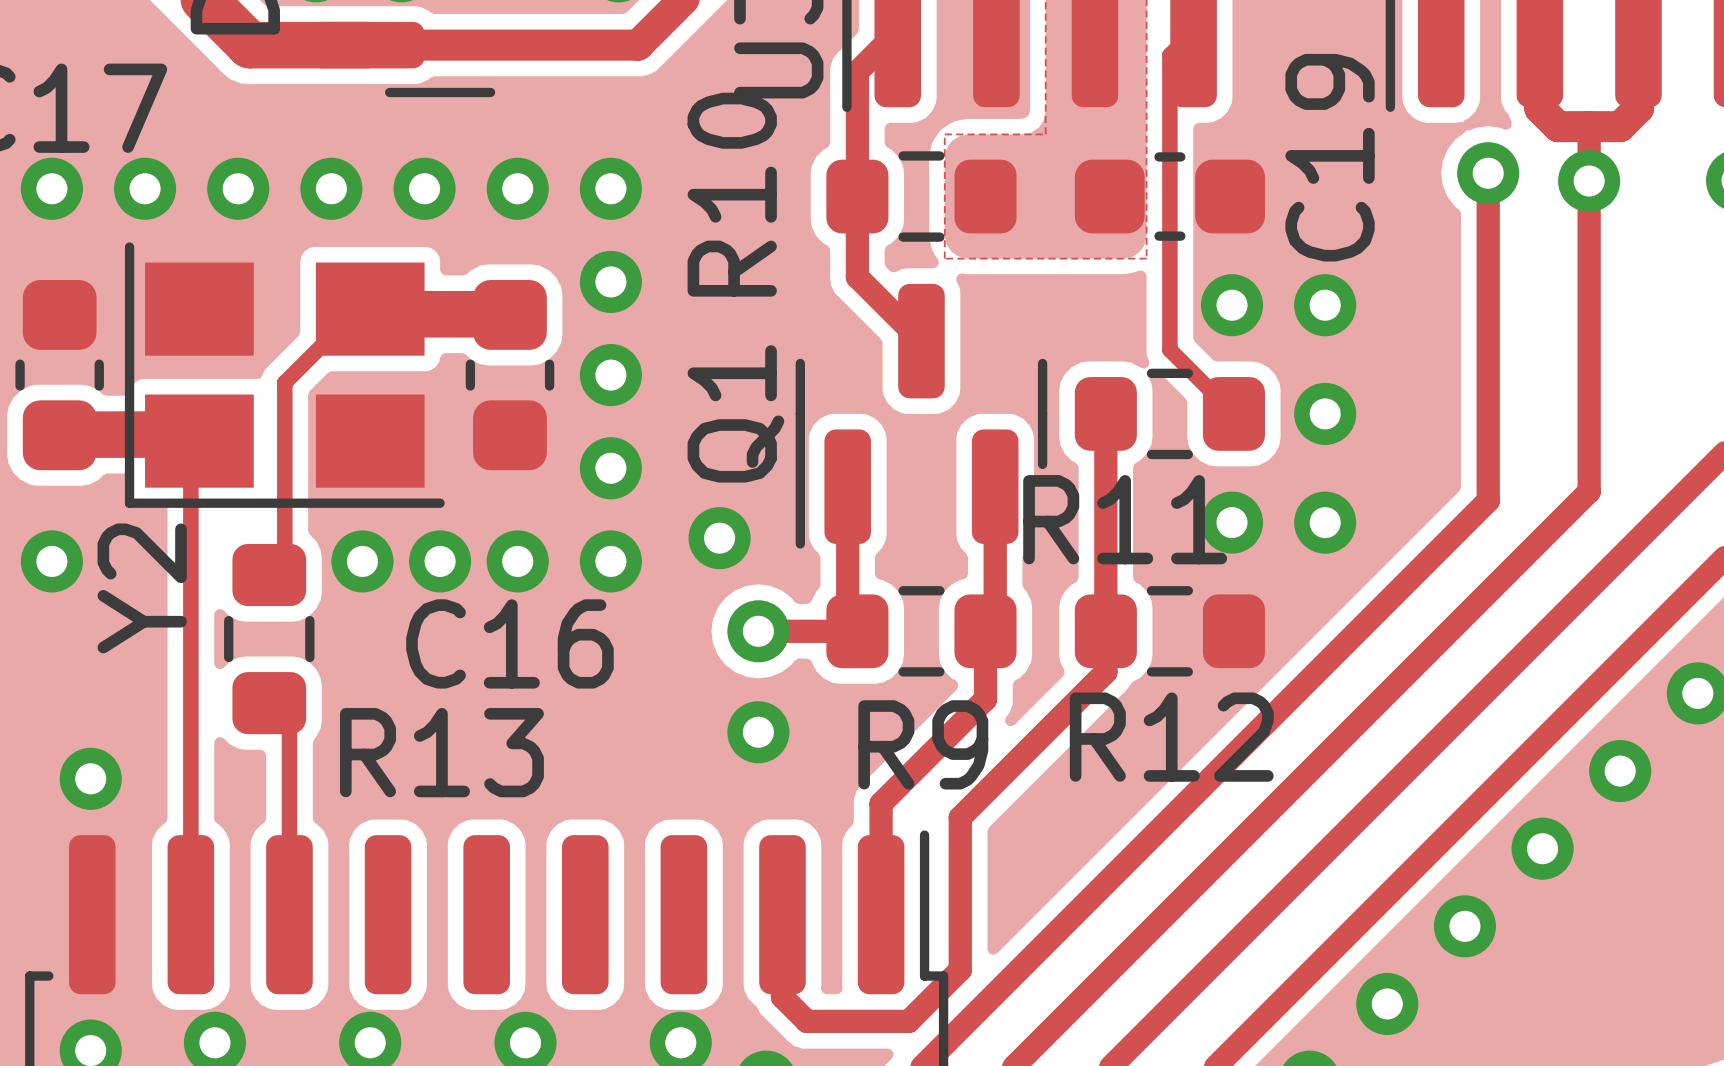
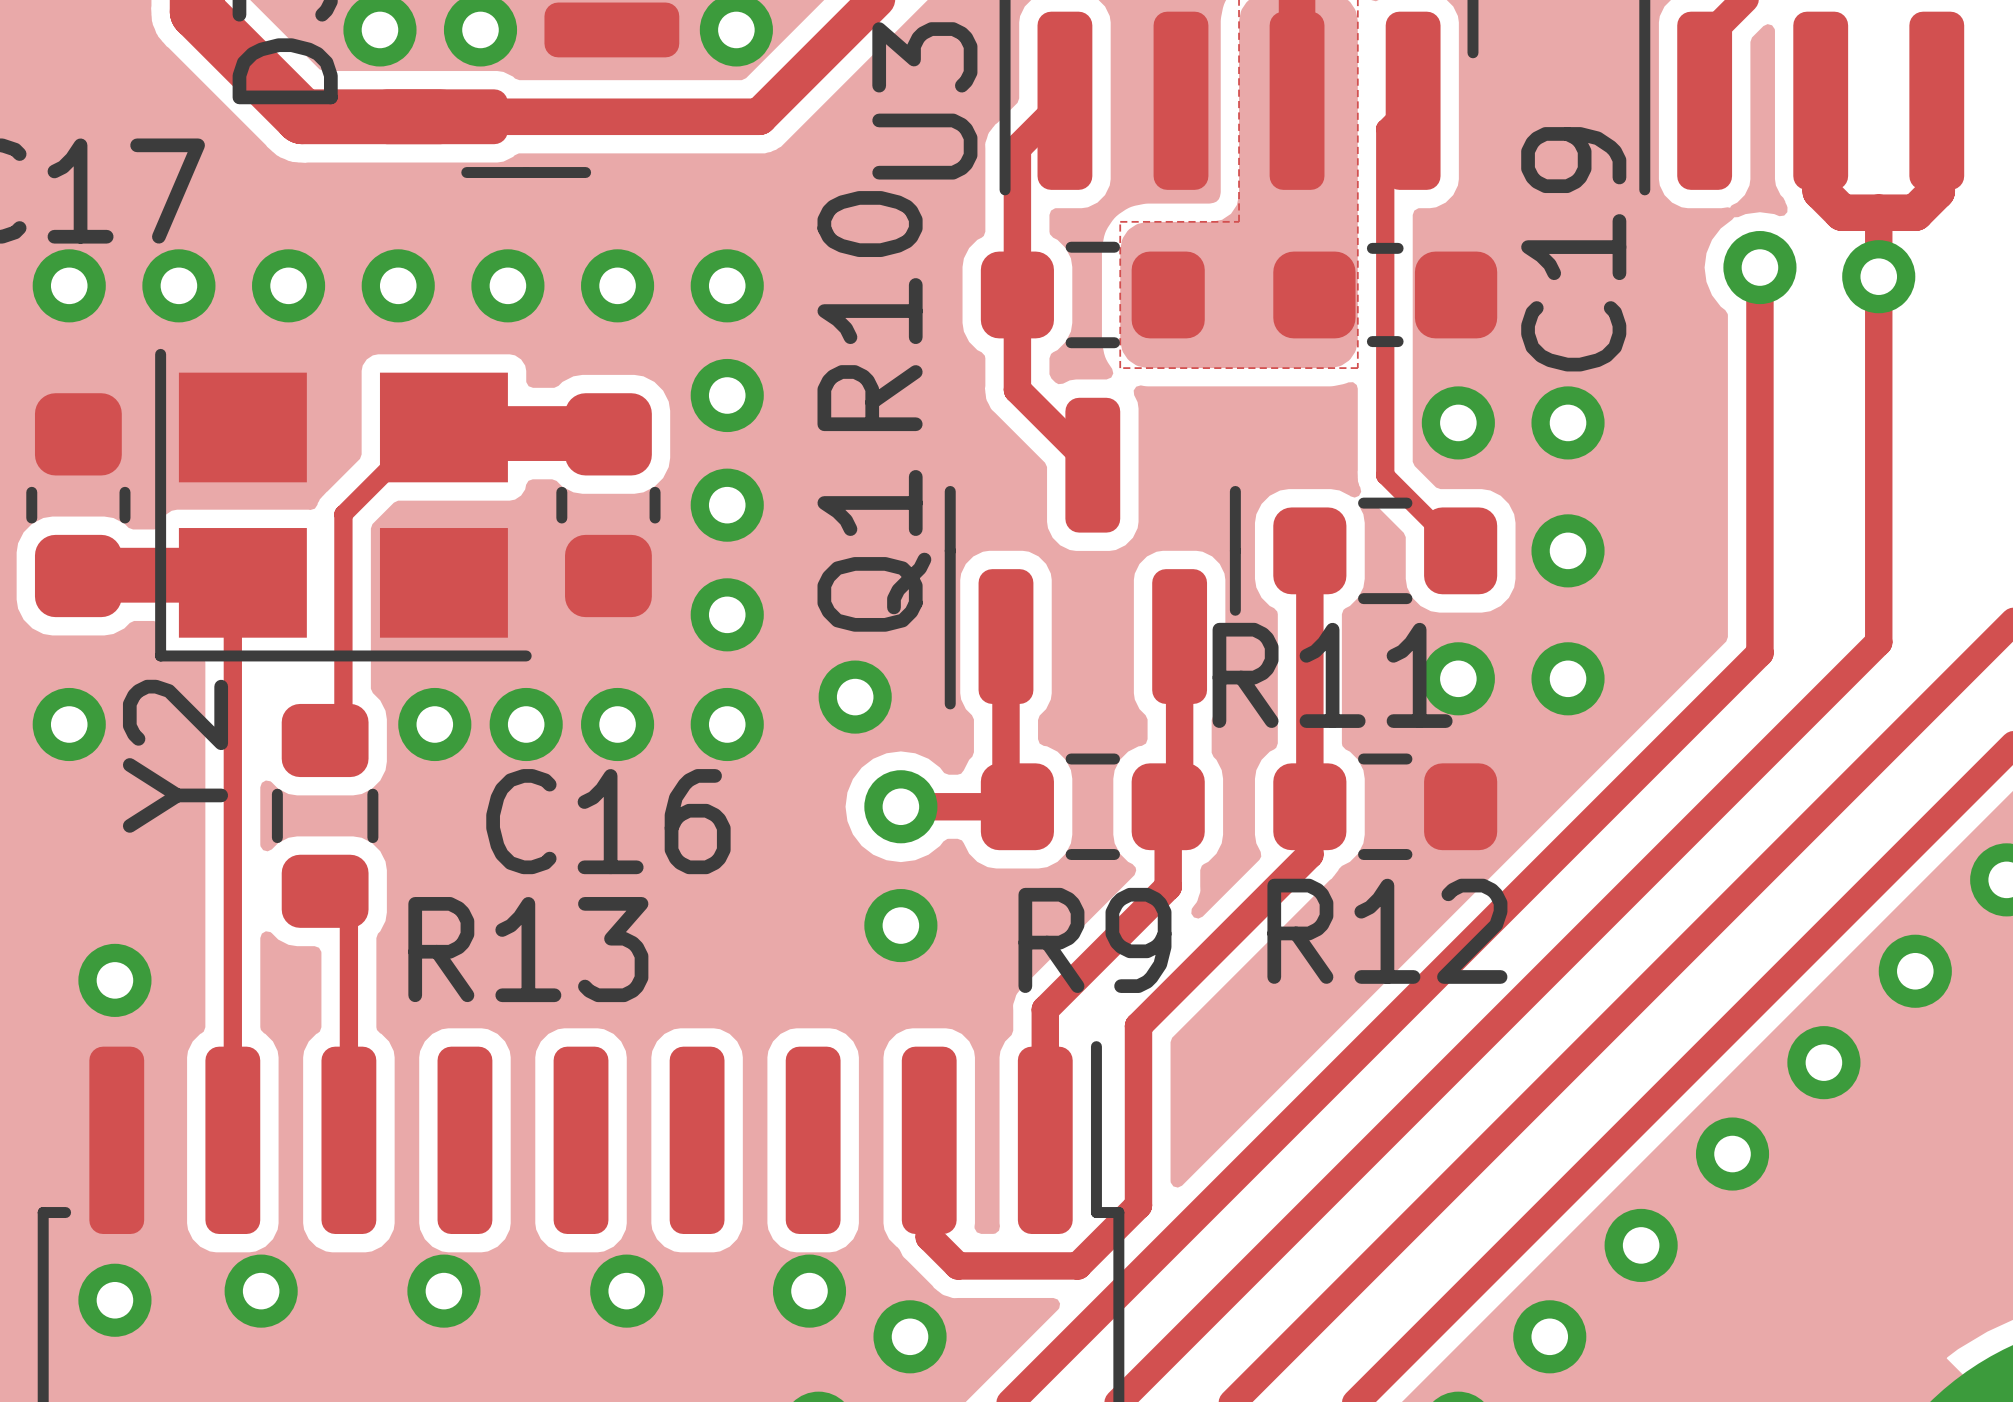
R10 name position: R10 (732, 194) -> R10 (870, 311)

